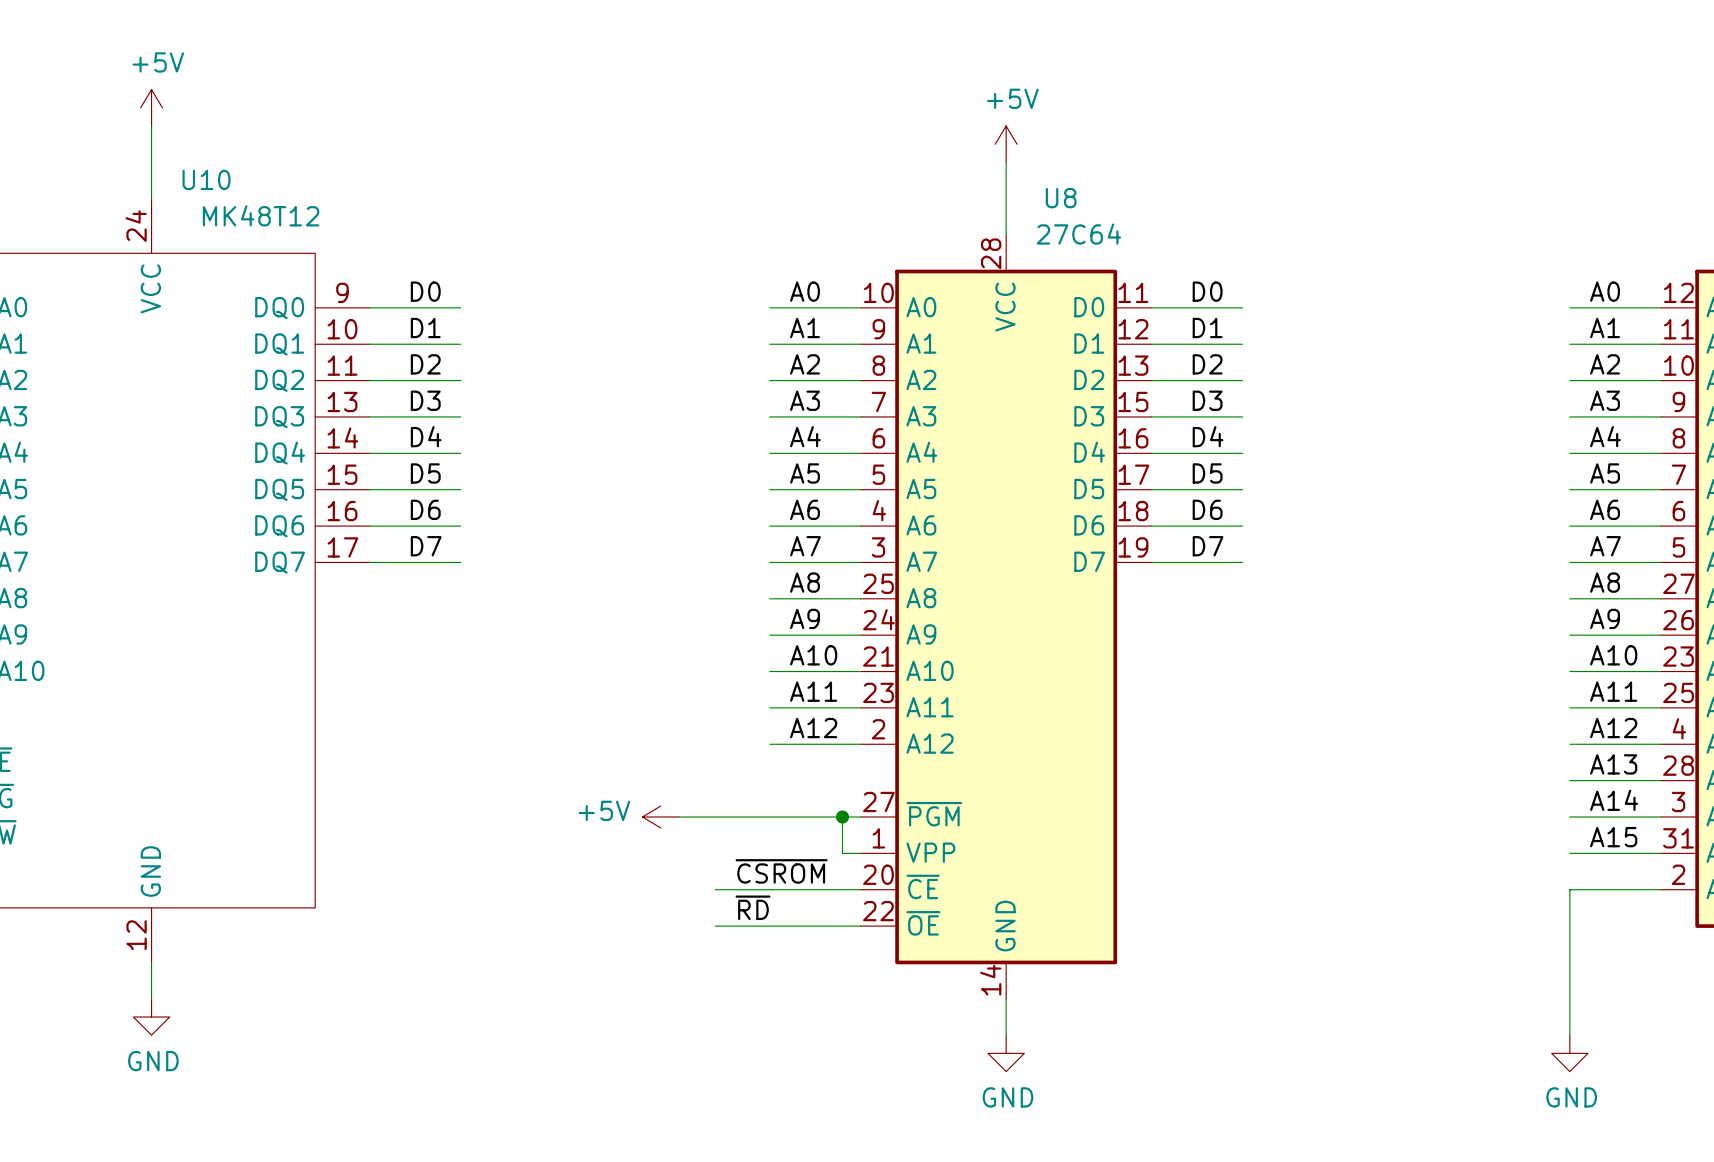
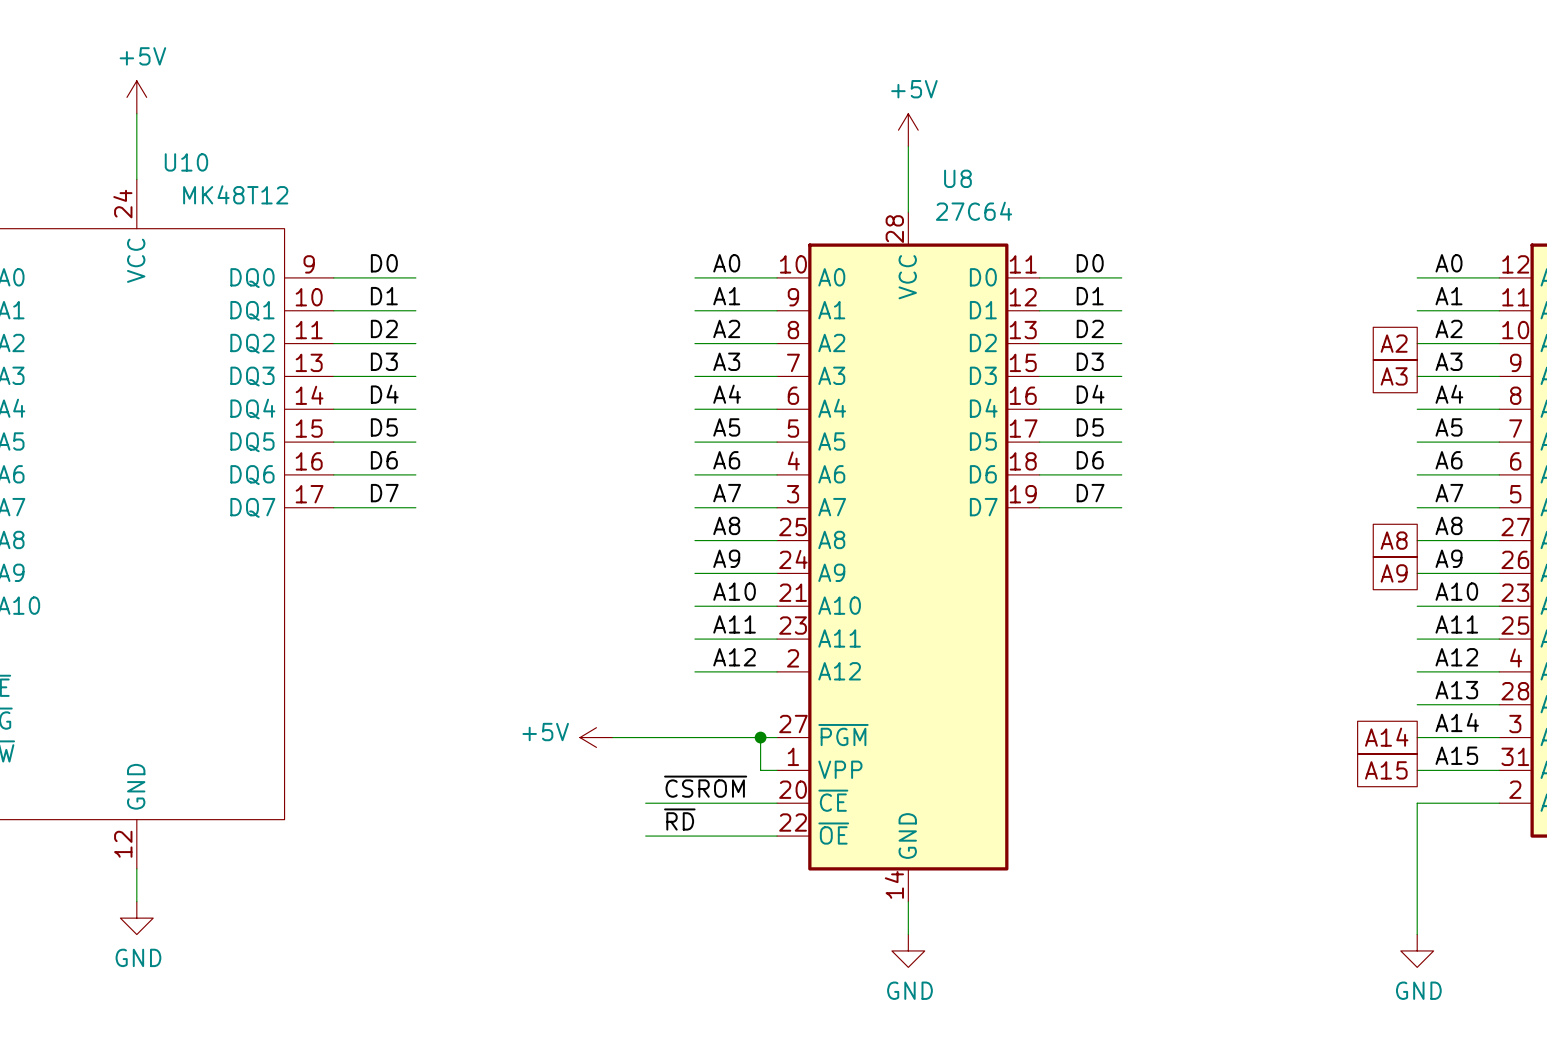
global label: none -> A2 (1394, 343)
global label: none -> A3 (1394, 376)
global label: none -> A8 (1394, 540)
global label: none -> A9 (1394, 573)
global label: none -> A14 (1386, 737)
global label: none -> A15 (1386, 770)

